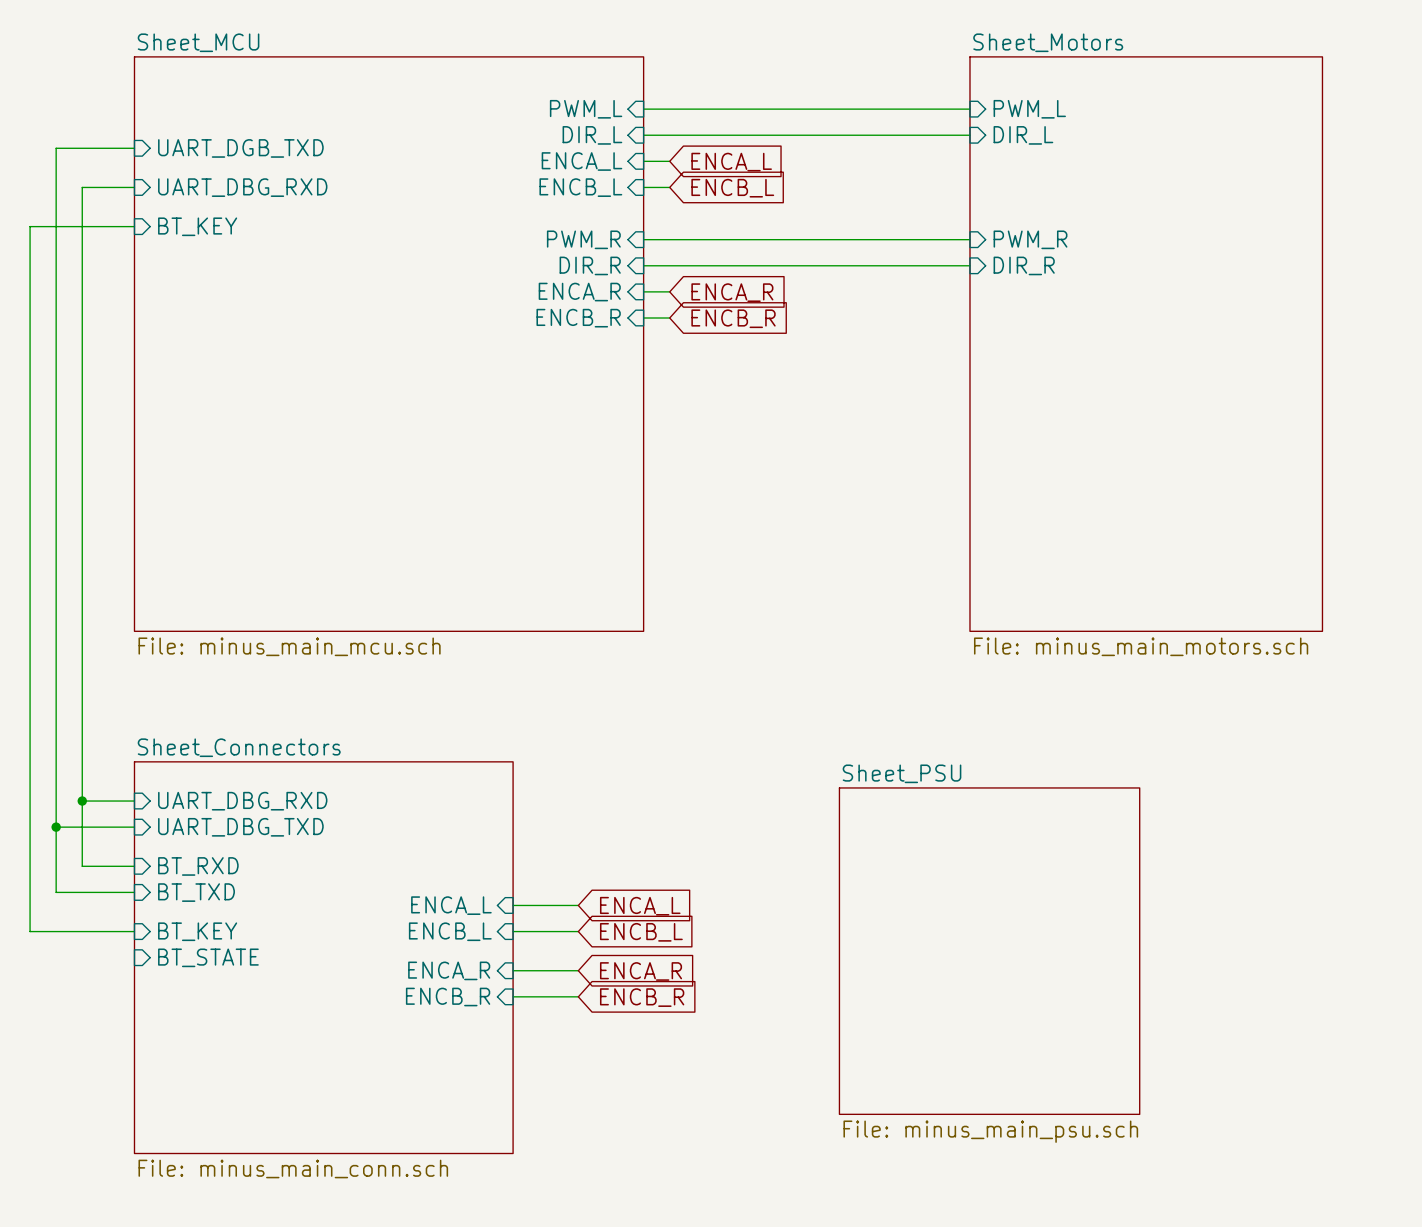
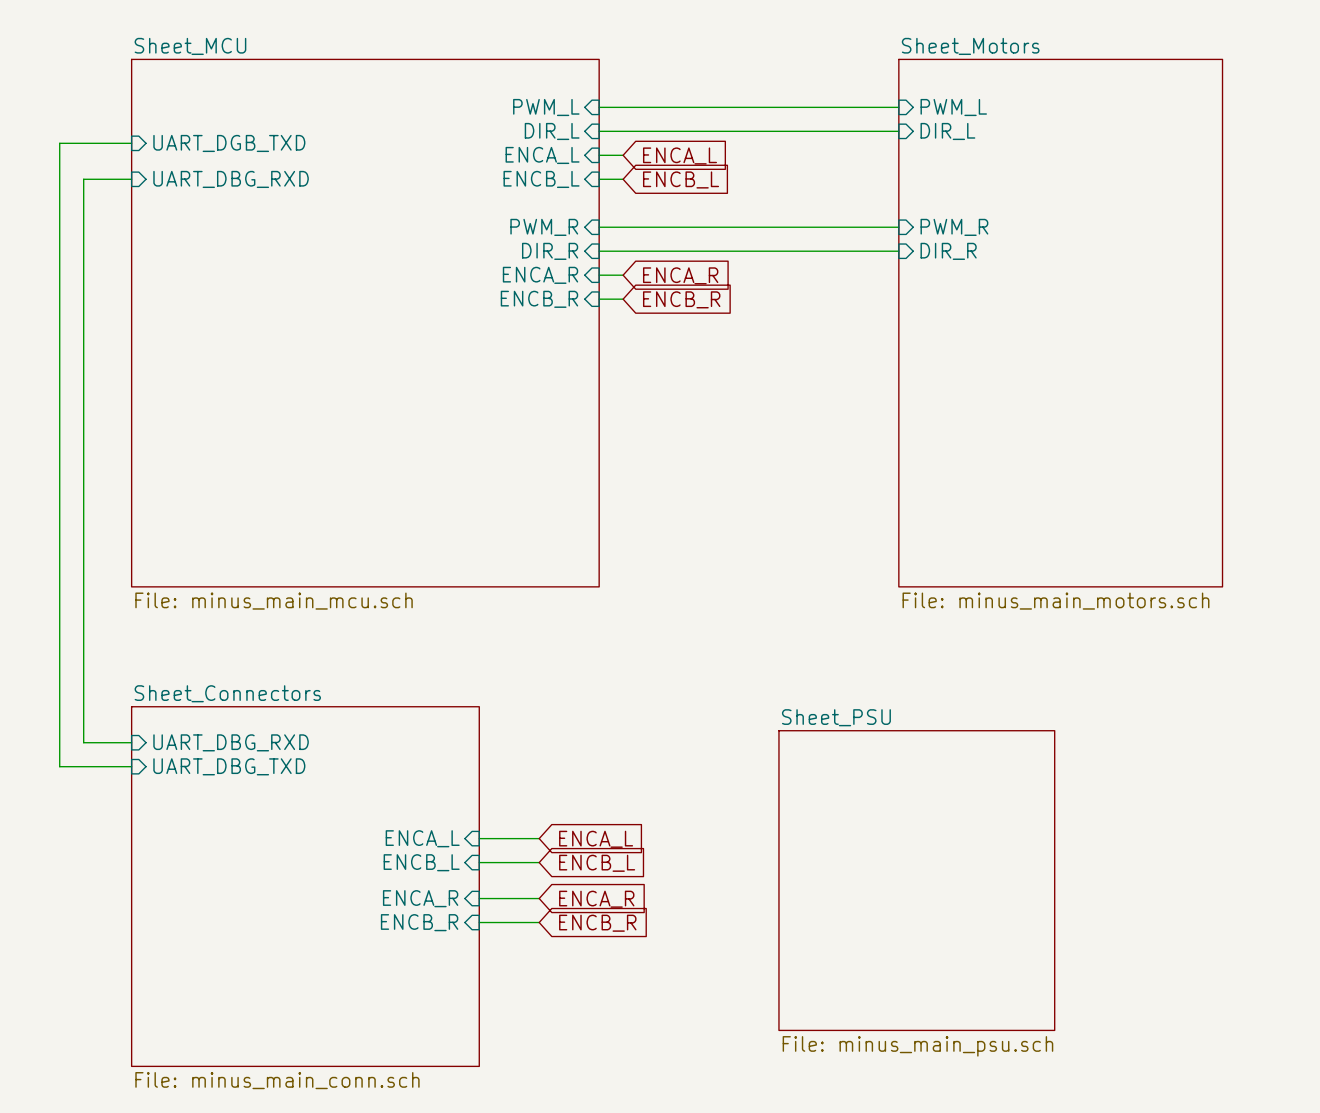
wire: (134, 226) (30, 226) (30, 931) (134, 931) -> none
sheet pin: BT_KEY (197, 226) -> none
wire: (82, 801) (82, 866) (134, 866) -> none
junction: (82, 801) -> none
wire: (56, 827) (56, 892) (134, 892) -> none
junction: (56, 827) -> none
sheet pin: BT_RXD (198, 866) -> none
sheet pin: BT_TXD (196, 892) -> none
sheet pin: BT_KEY (197, 931) -> none
sheet pin: BT_STATE (208, 957) -> none

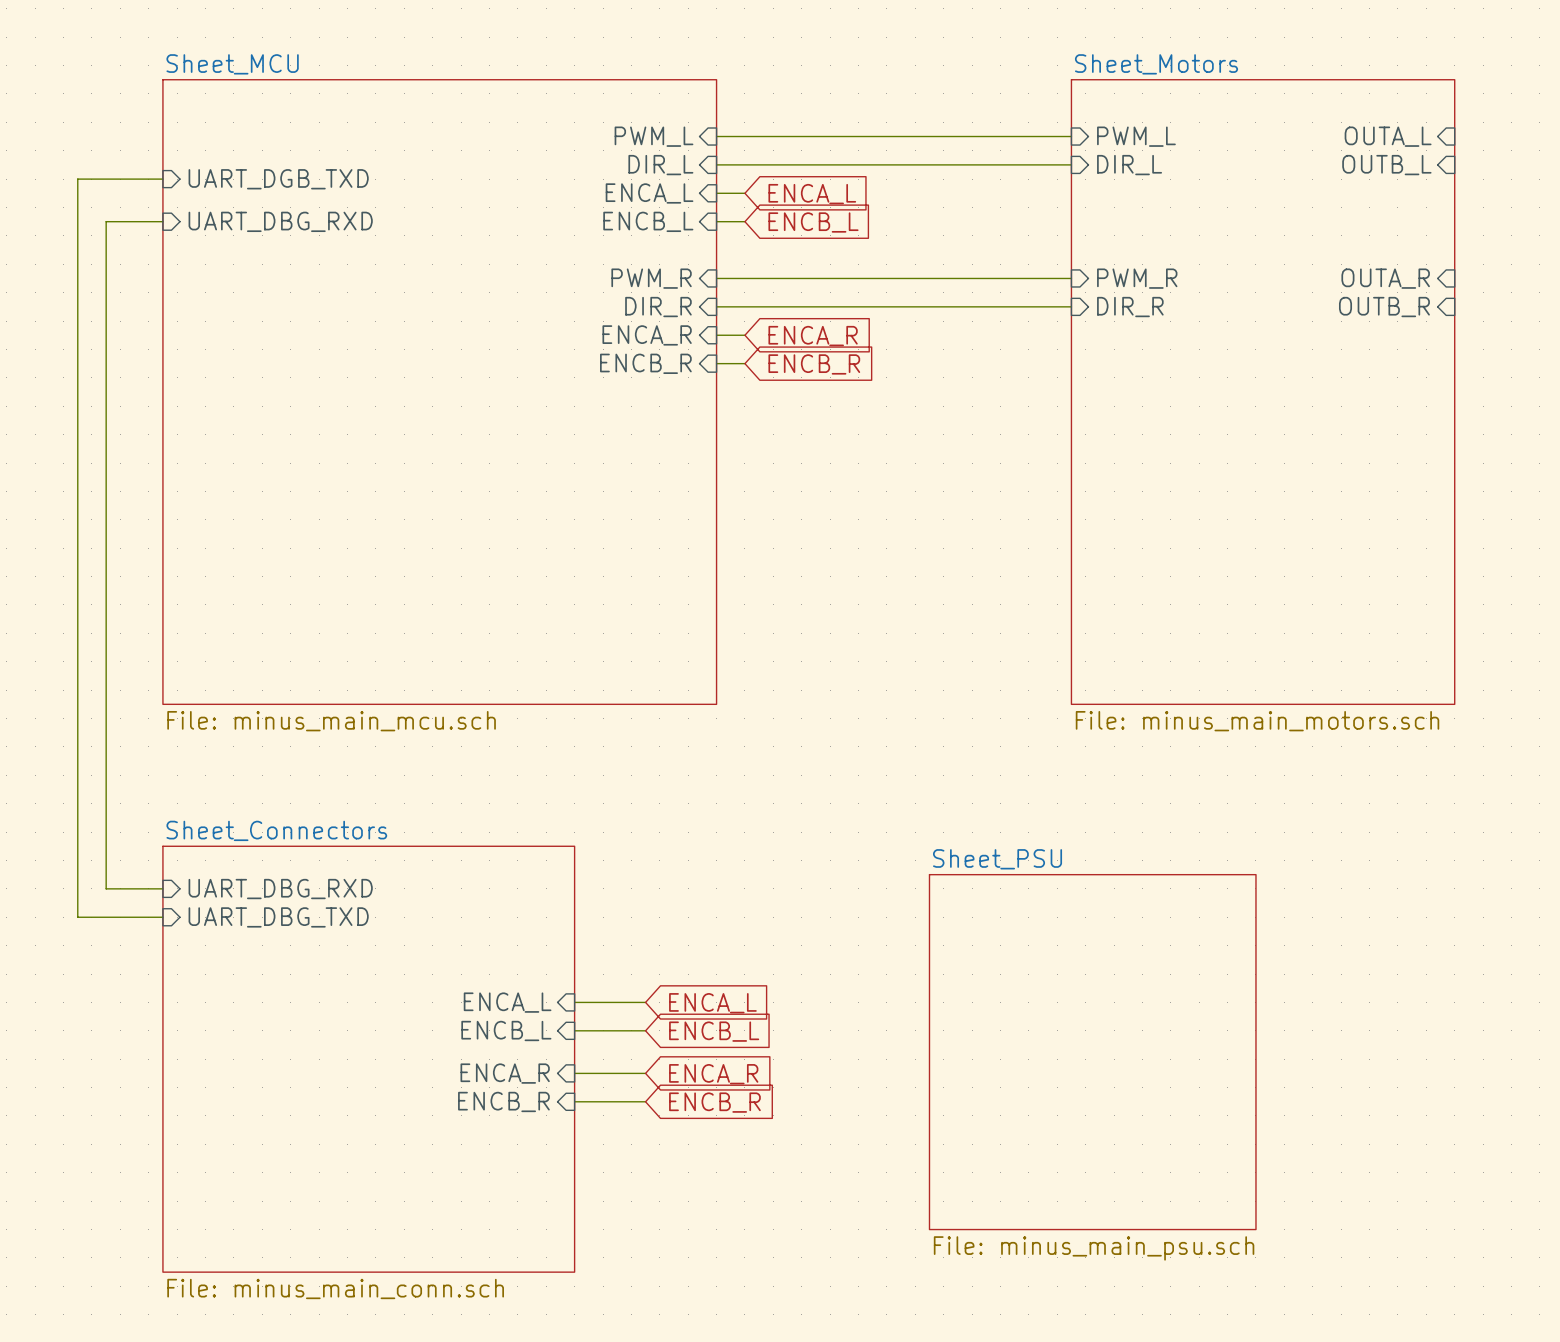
sheet pin: none -> OUTA_L (1388, 136)
sheet pin: none -> OUTB_L (1386, 165)
sheet pin: none -> OUTA_R (1385, 278)
sheet pin: none -> OUTB_R (1384, 307)

